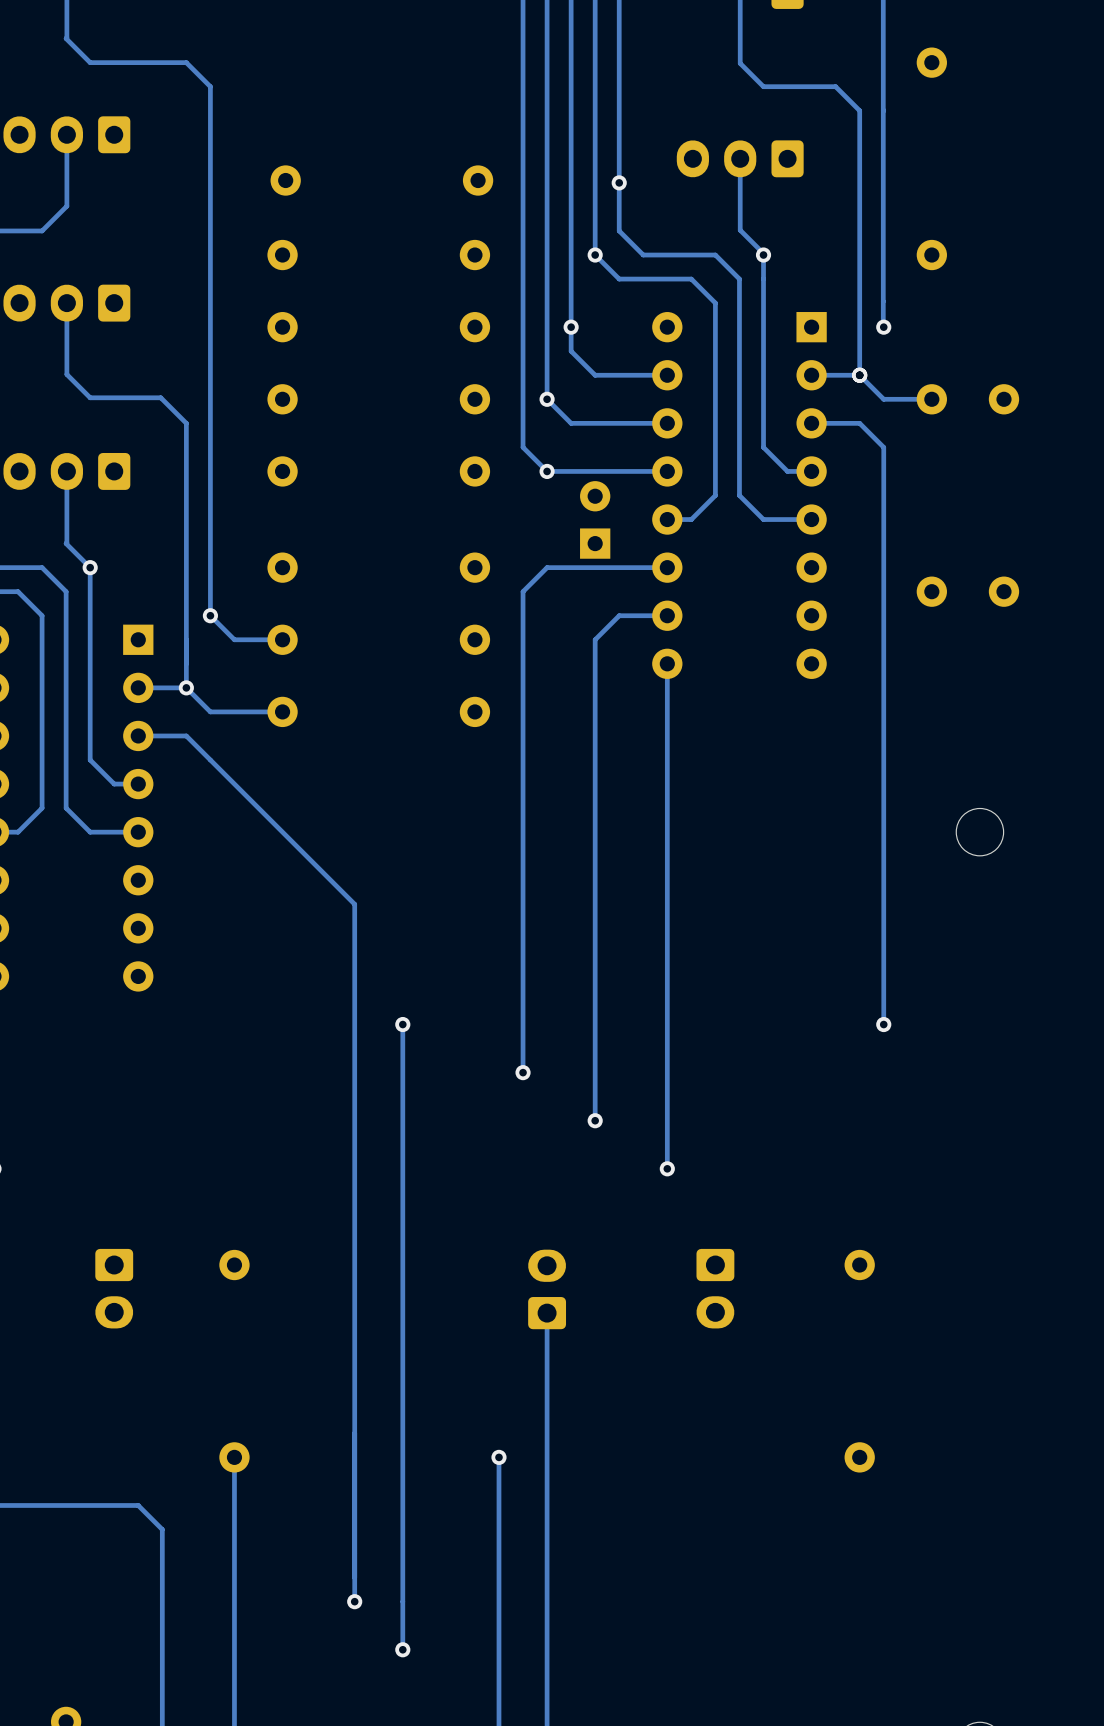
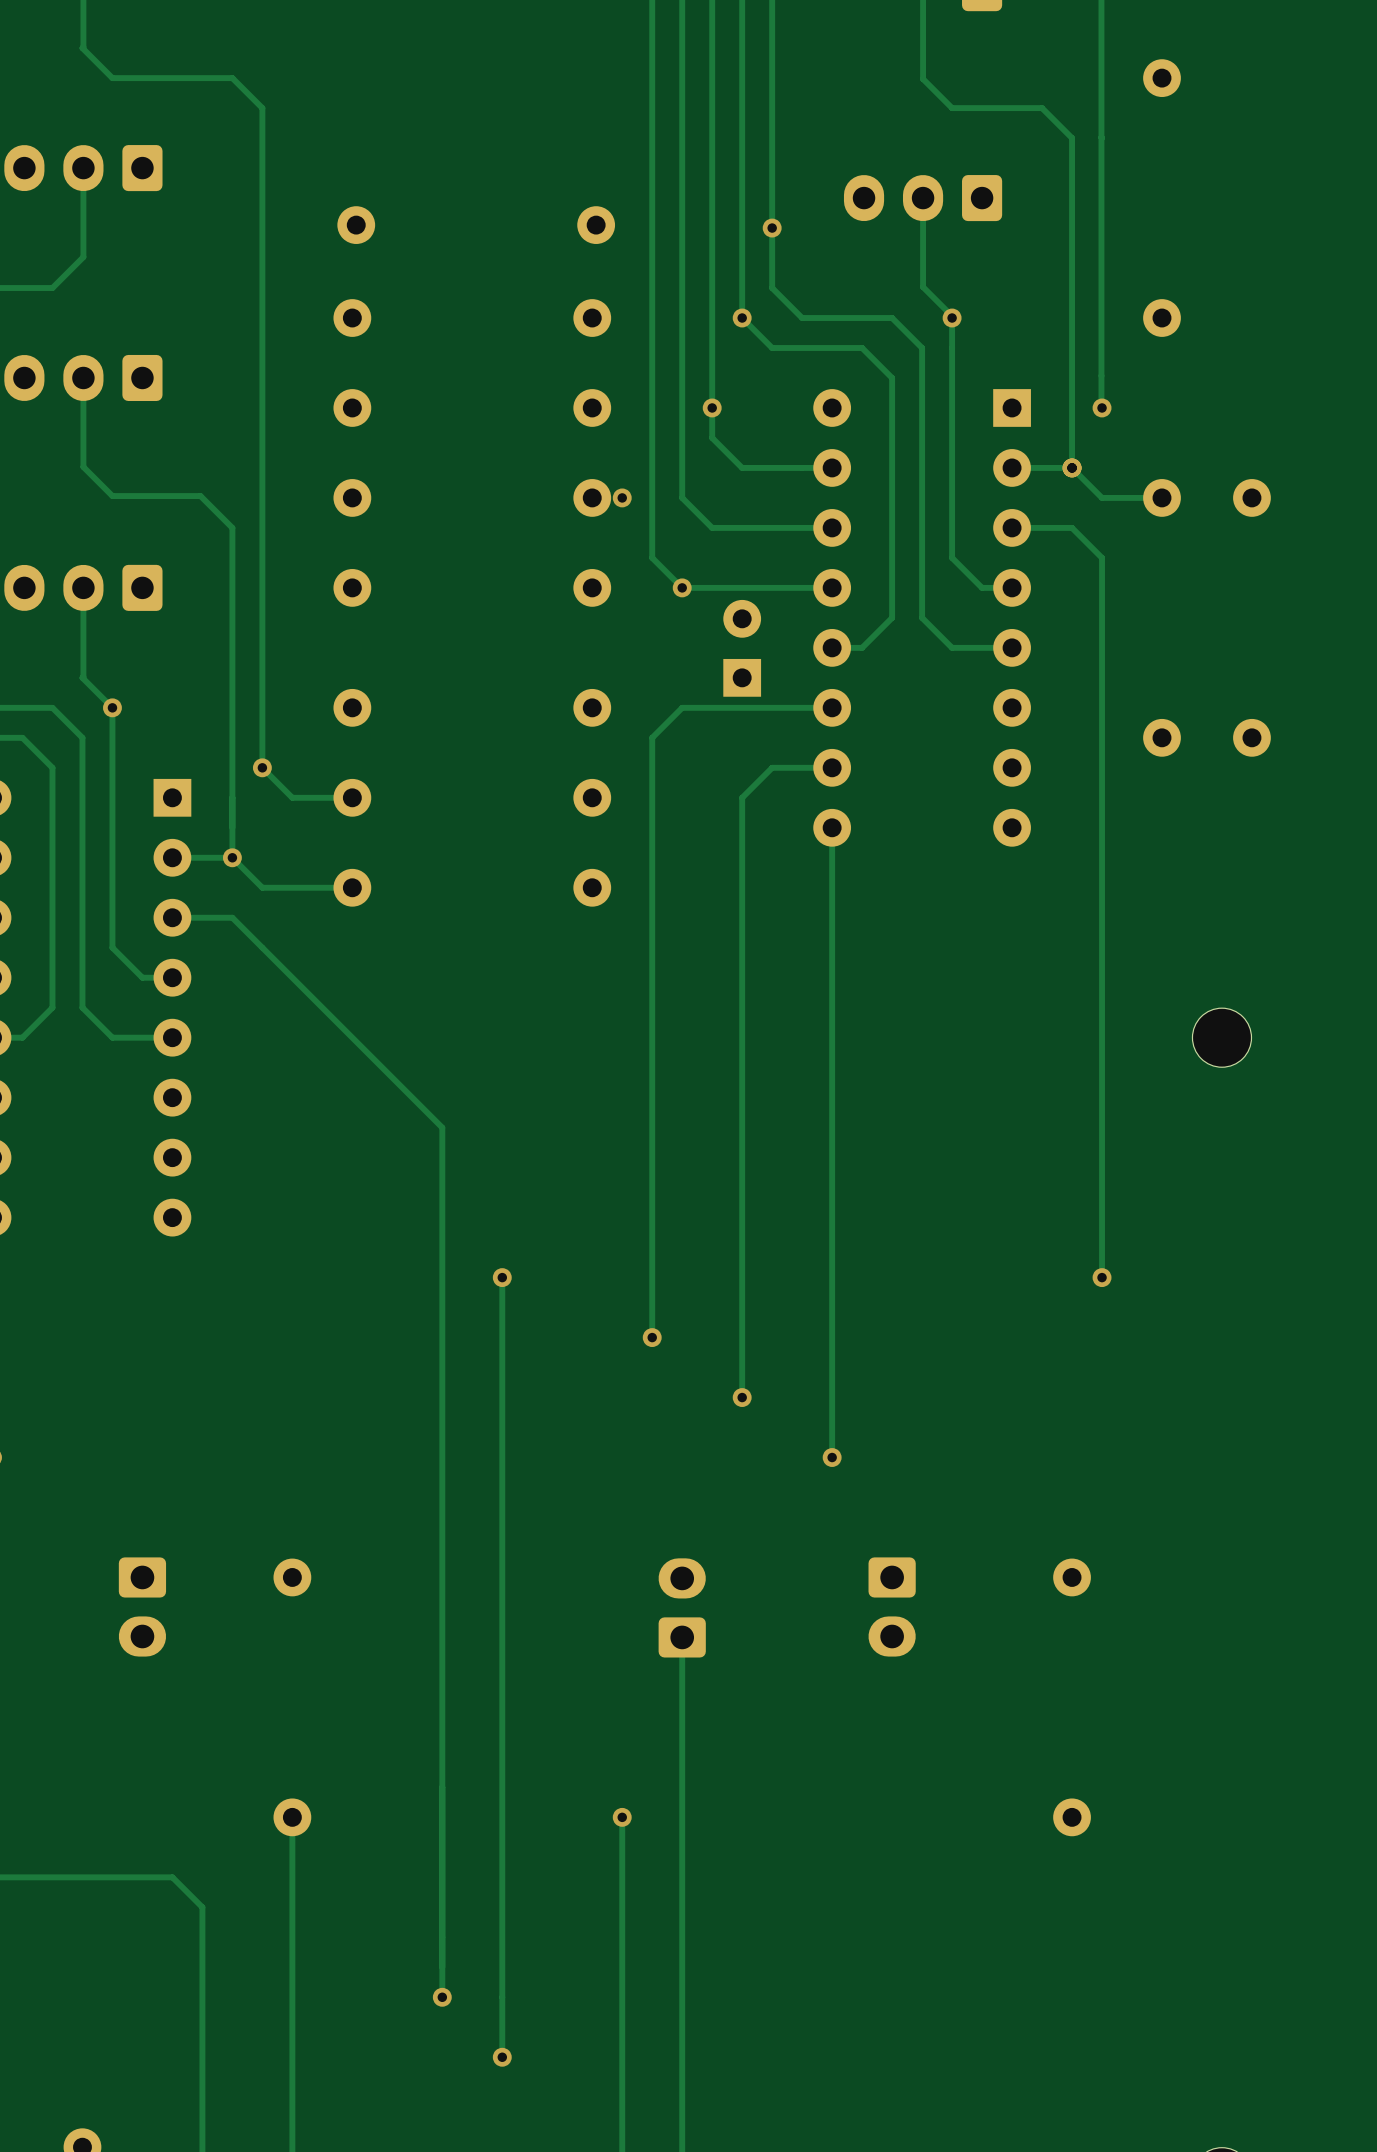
via position: (547, 399) -> (622, 497)

